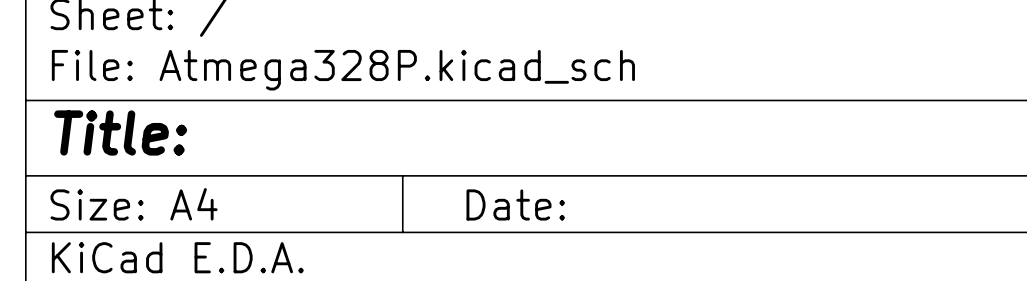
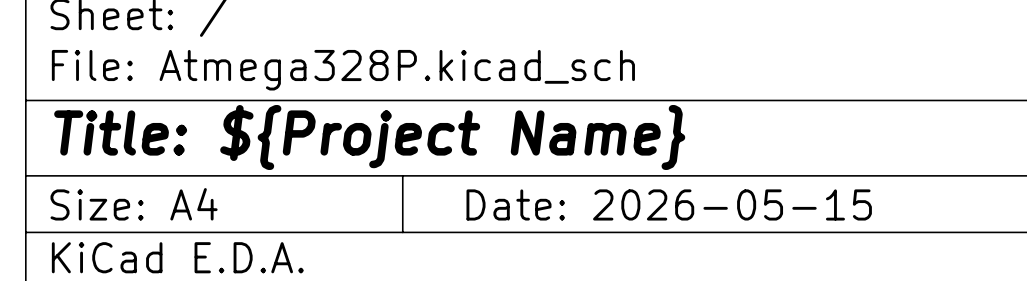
title block: Title: (120, 132) -> Title: ${Project Name} (369, 137)
title block: Date: (515, 204) -> Date: 2026-05-15 (669, 204)

